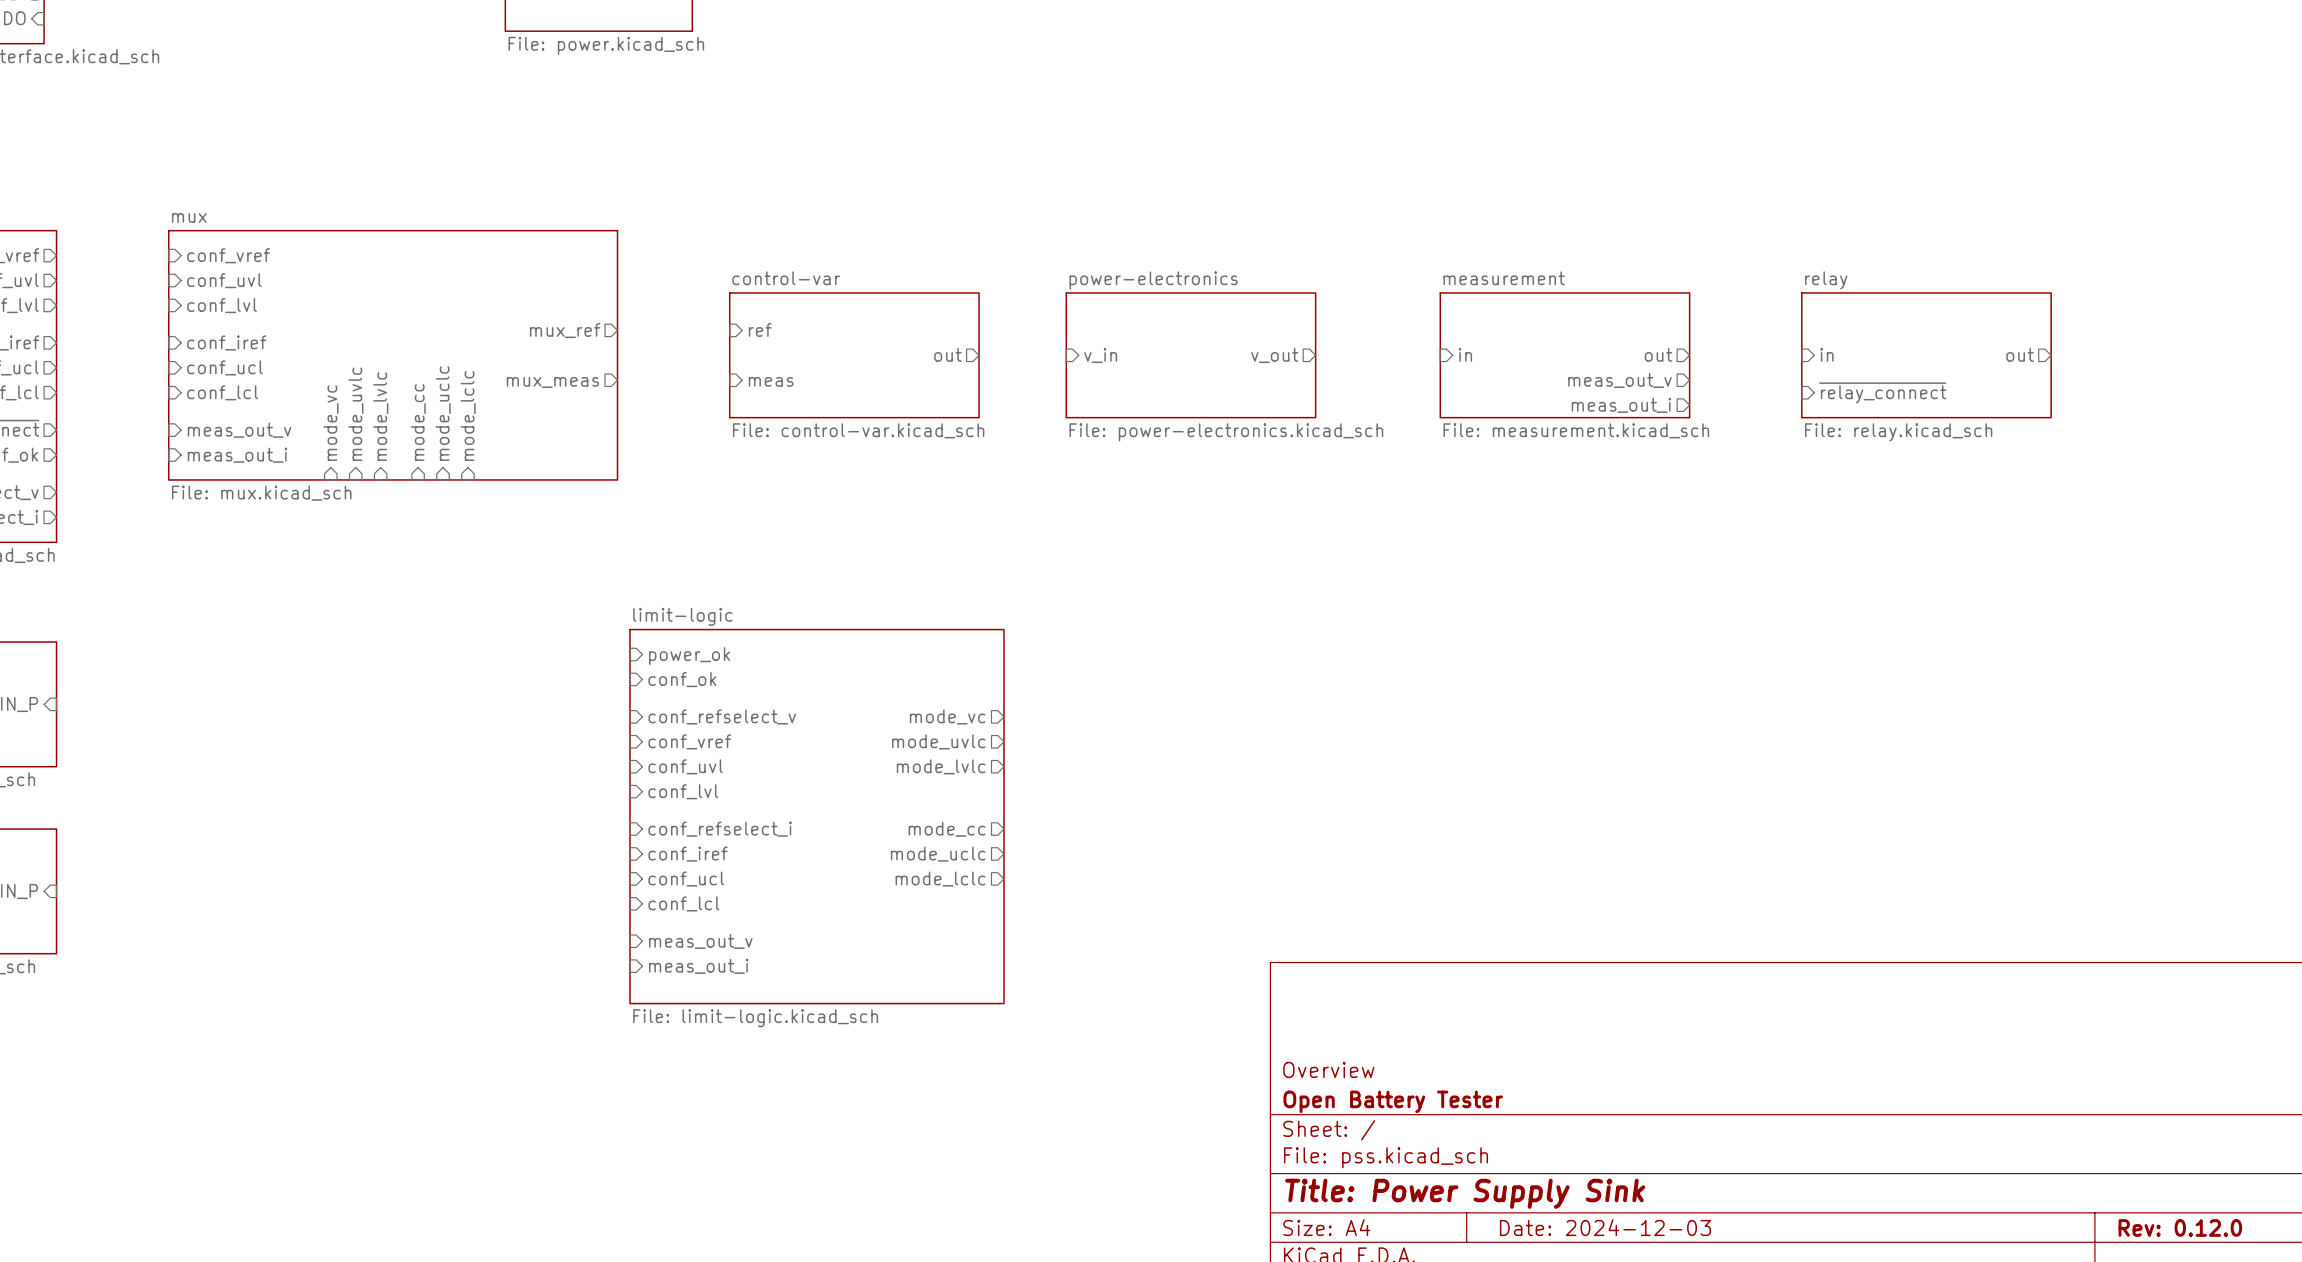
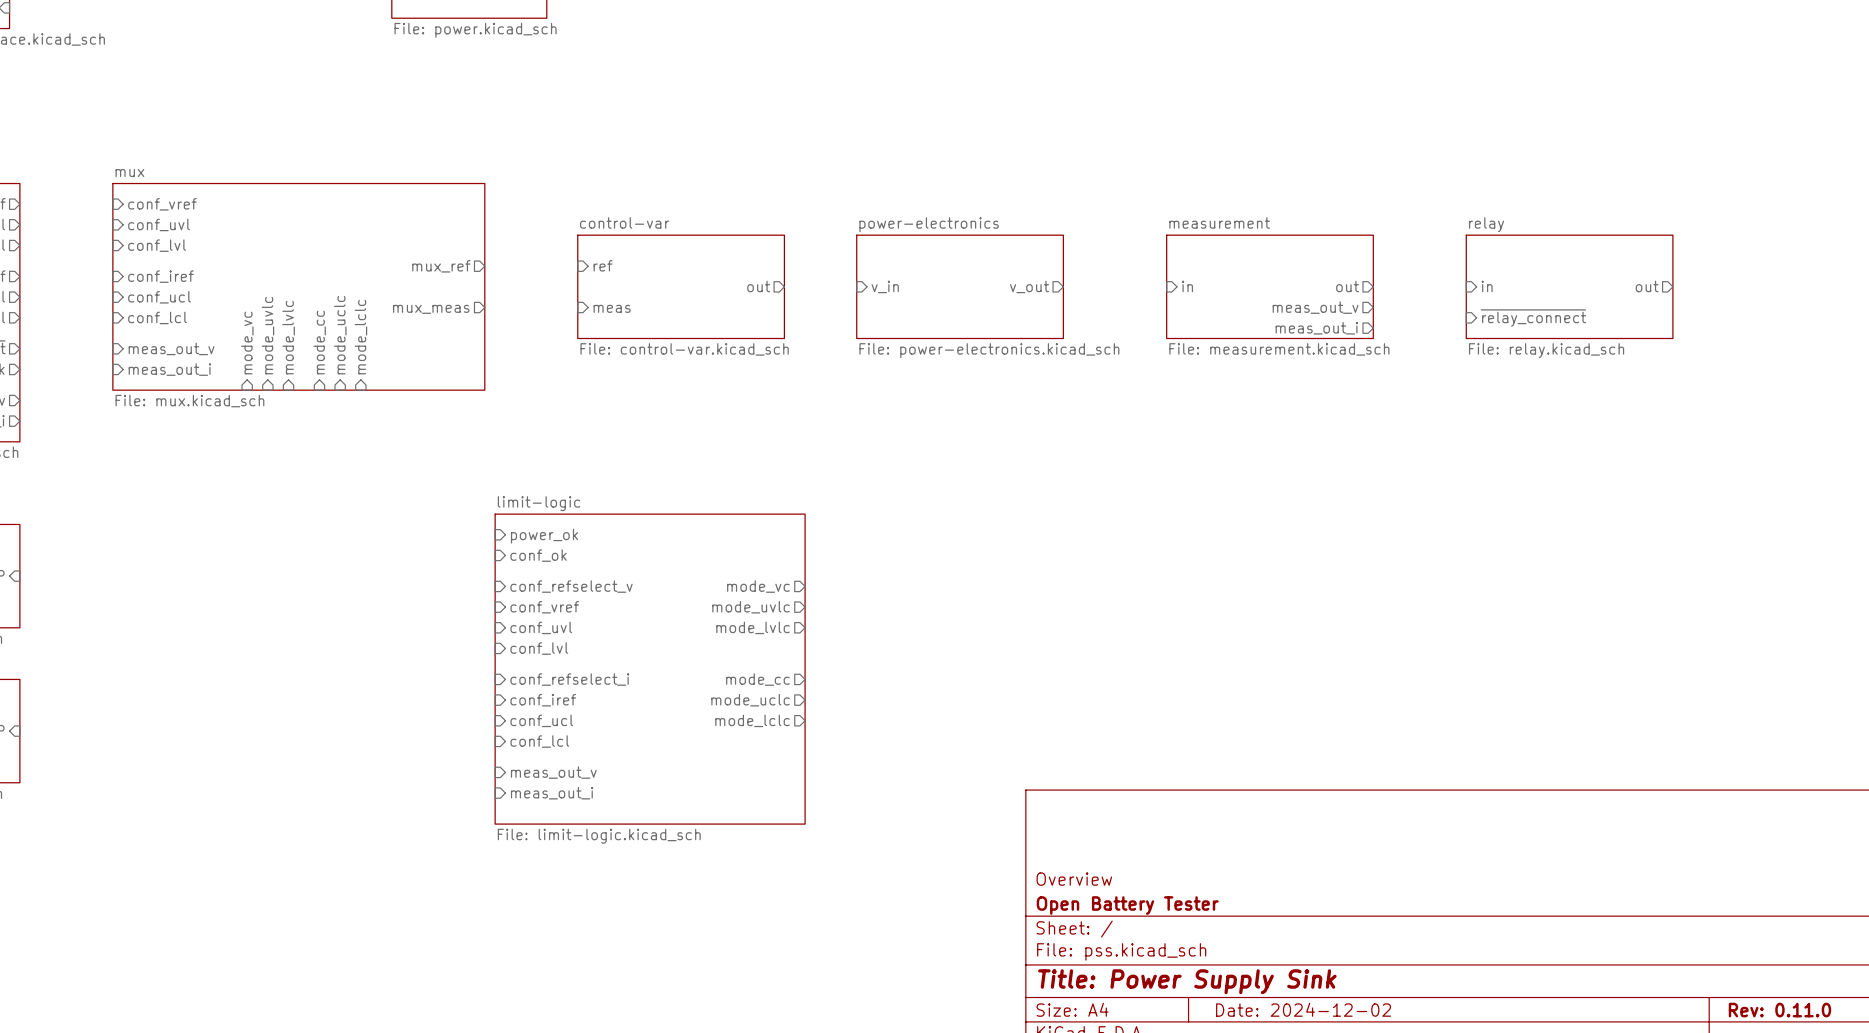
title block: Date: 2024-12-03 (1605, 1227) -> Date: 2024-12-02 (1303, 1009)
title block: Rev: 0.12.0 (2180, 1227) -> Rev: 0.11.0 (1779, 1010)

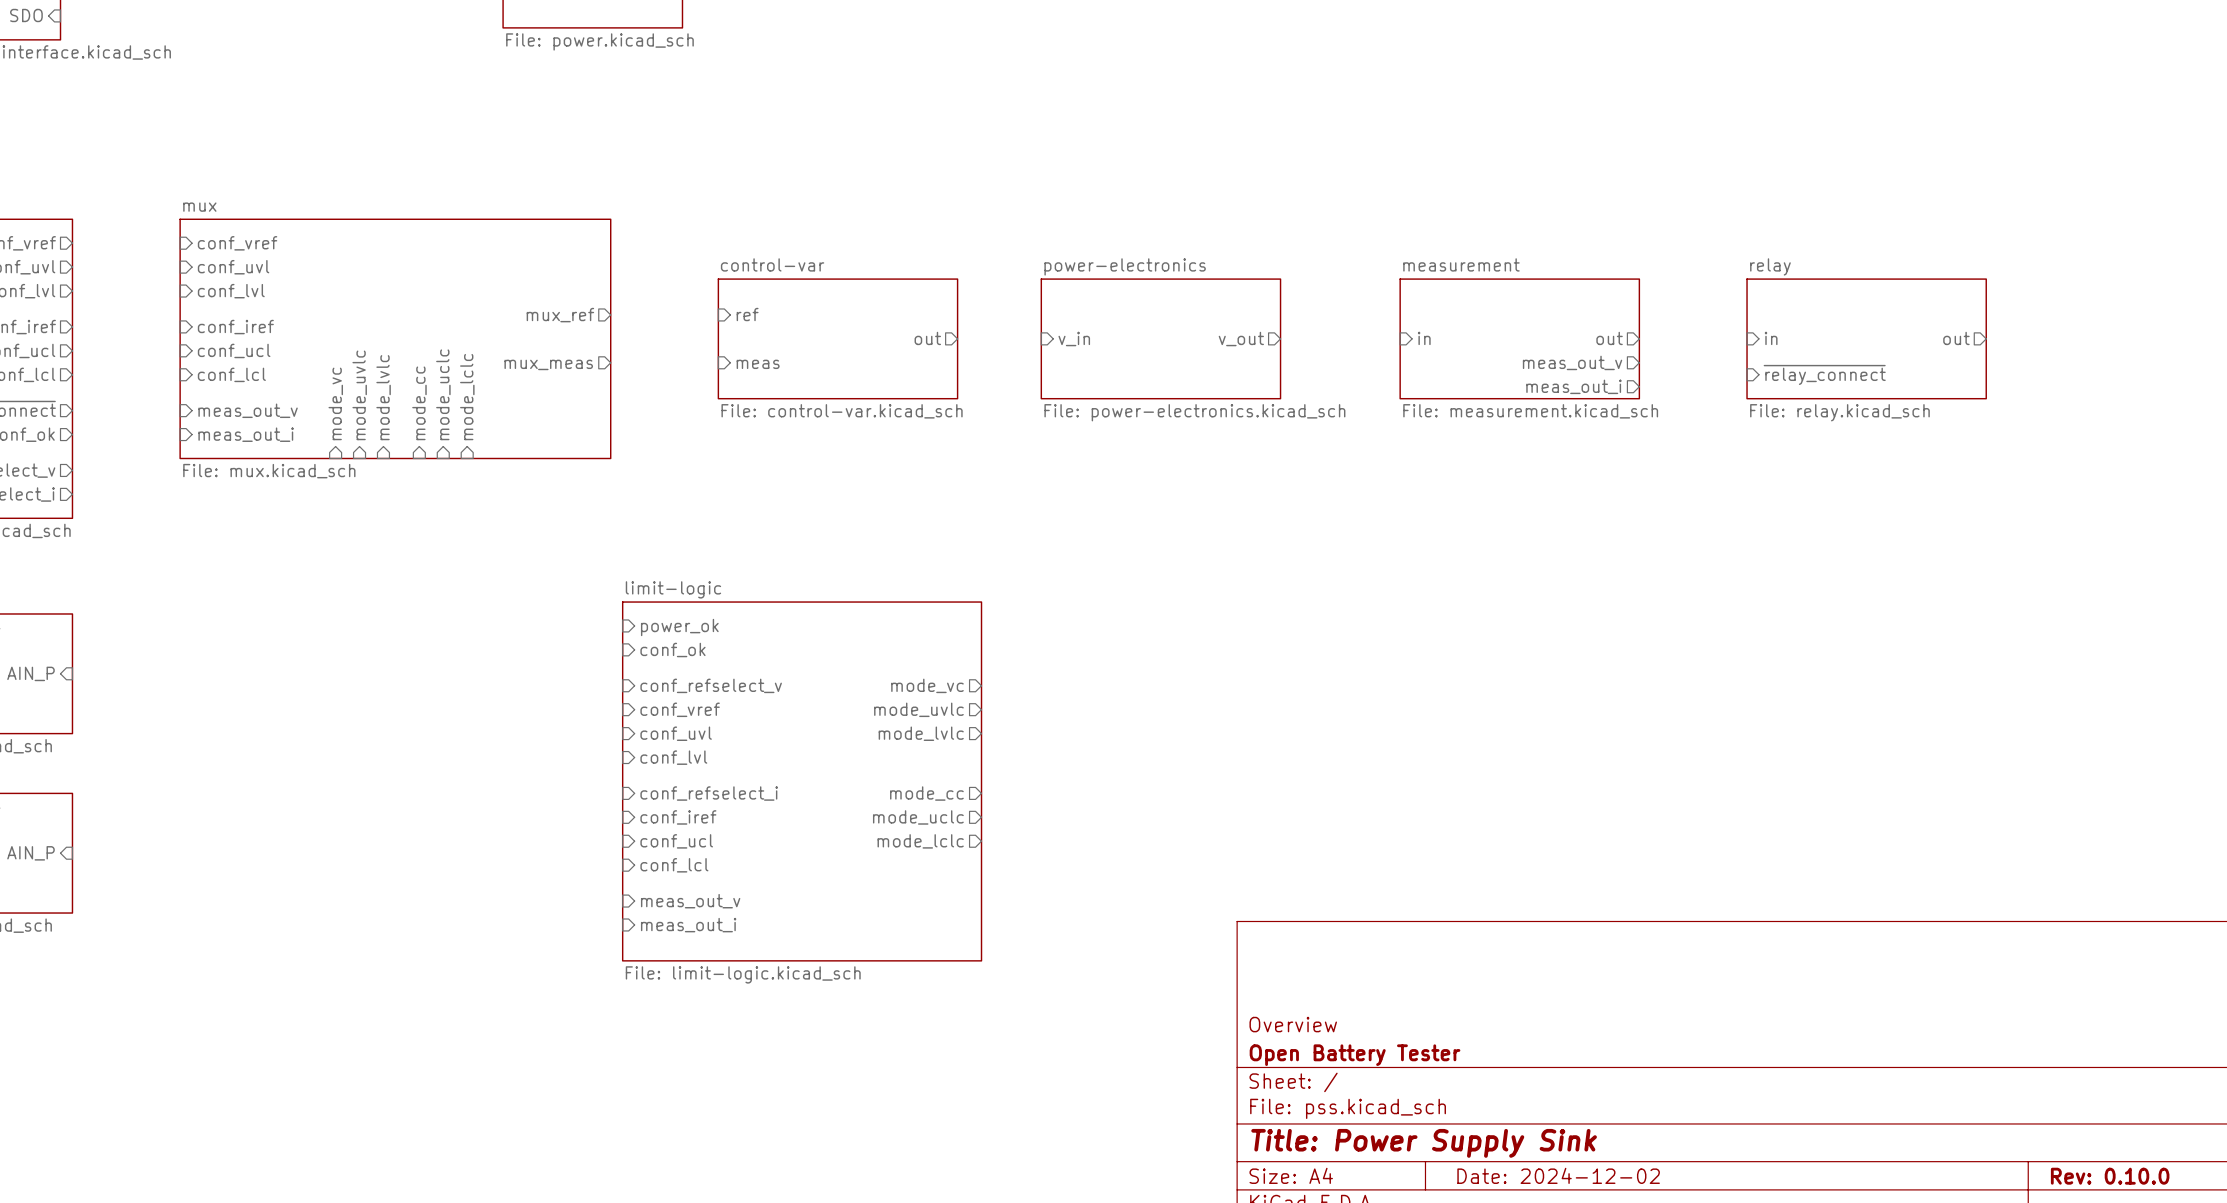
title block: Rev: 0.11.0 (1779, 1010) -> Rev: 0.10.0 (2110, 1176)

